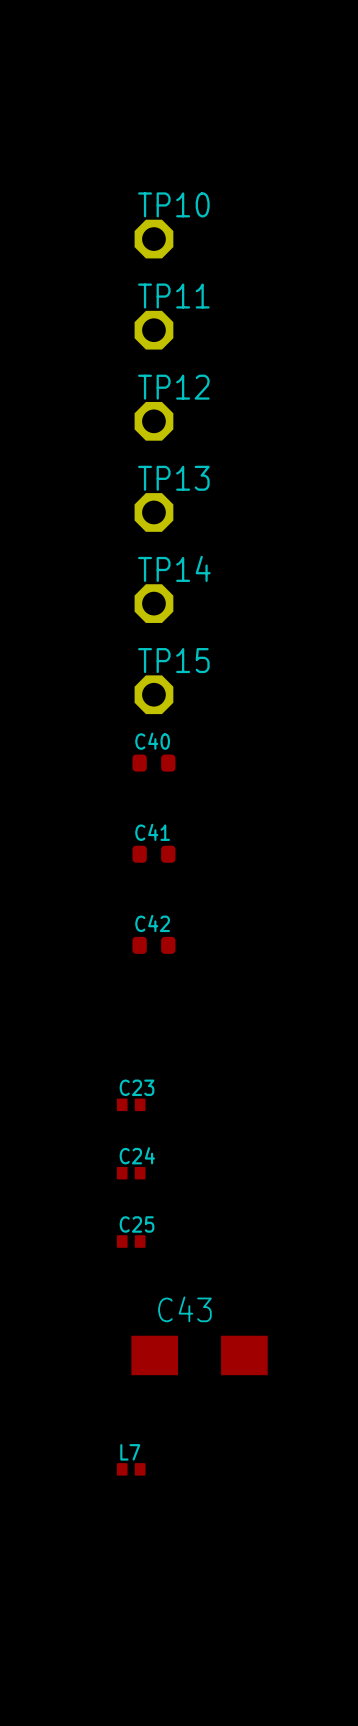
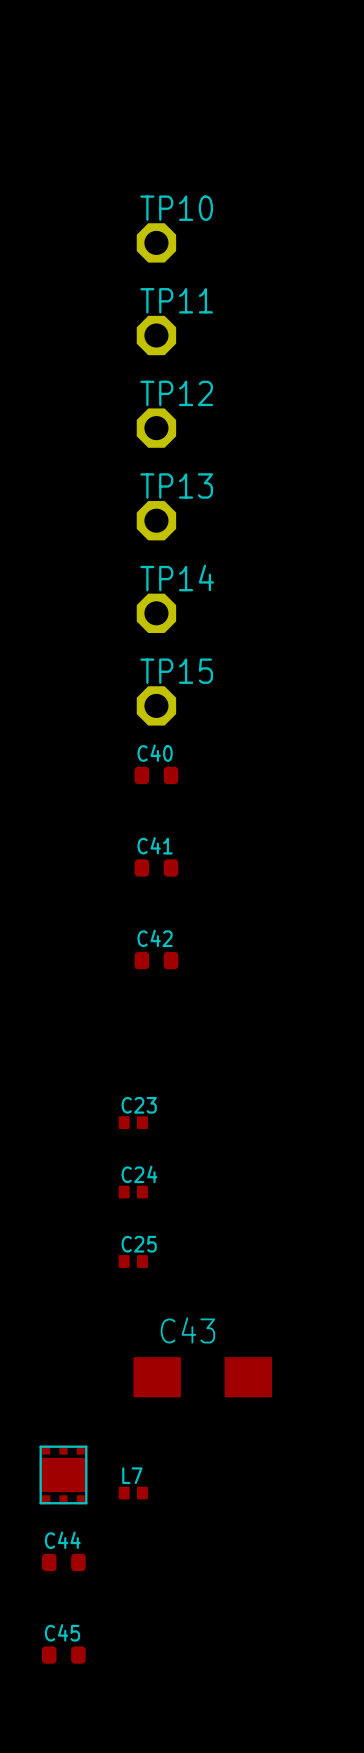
part: none -> (63, 1474)
C44: none -> (63, 1562)
C45: none -> (63, 1655)

